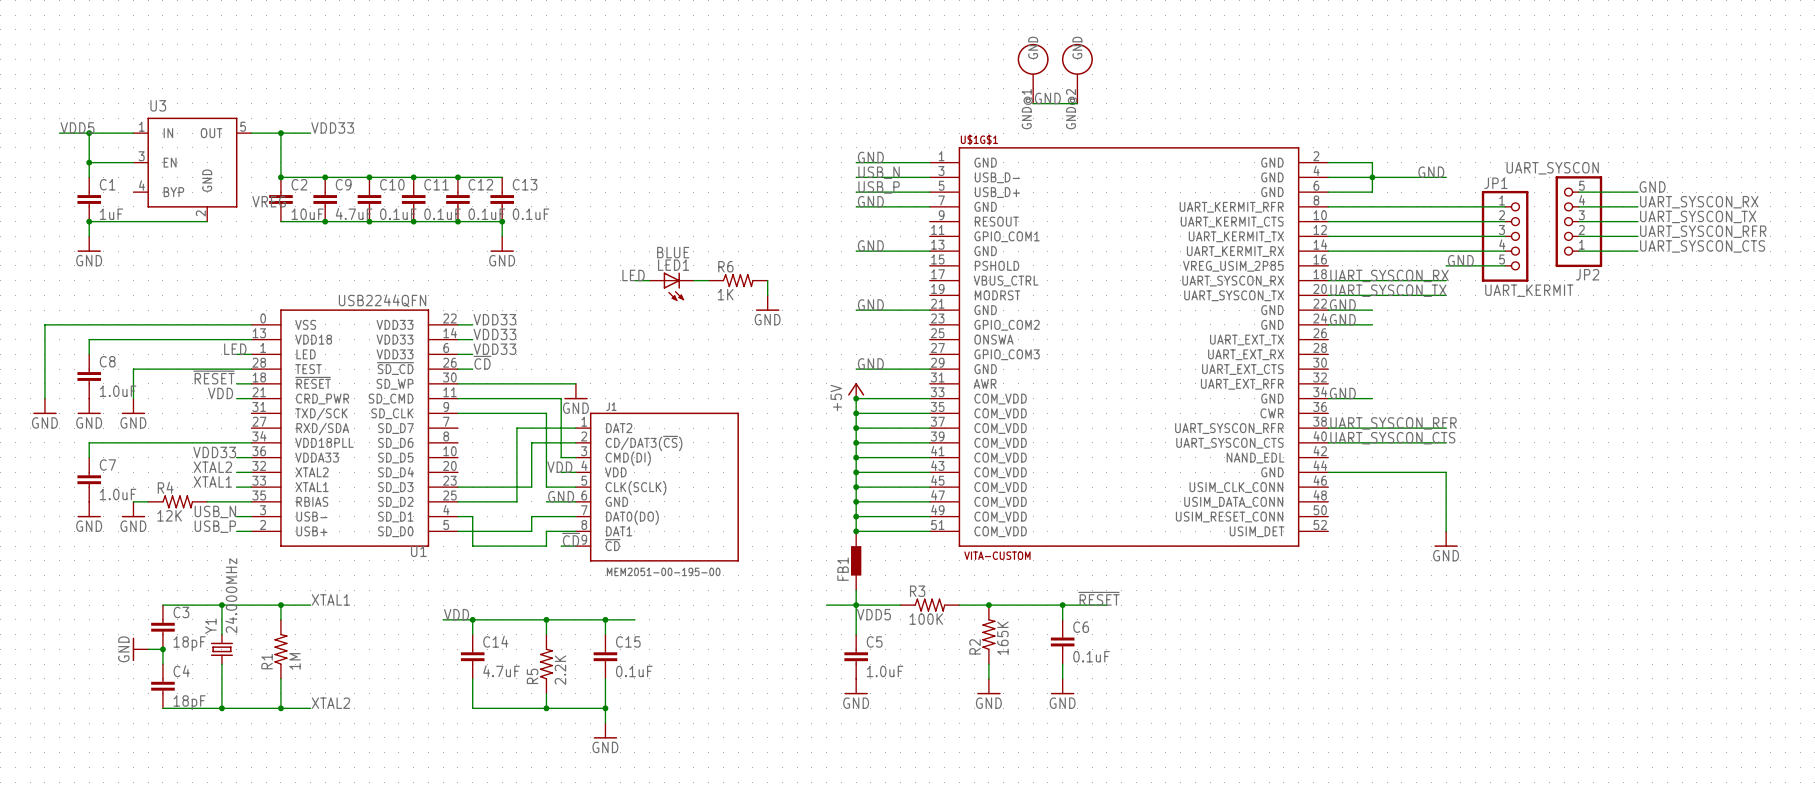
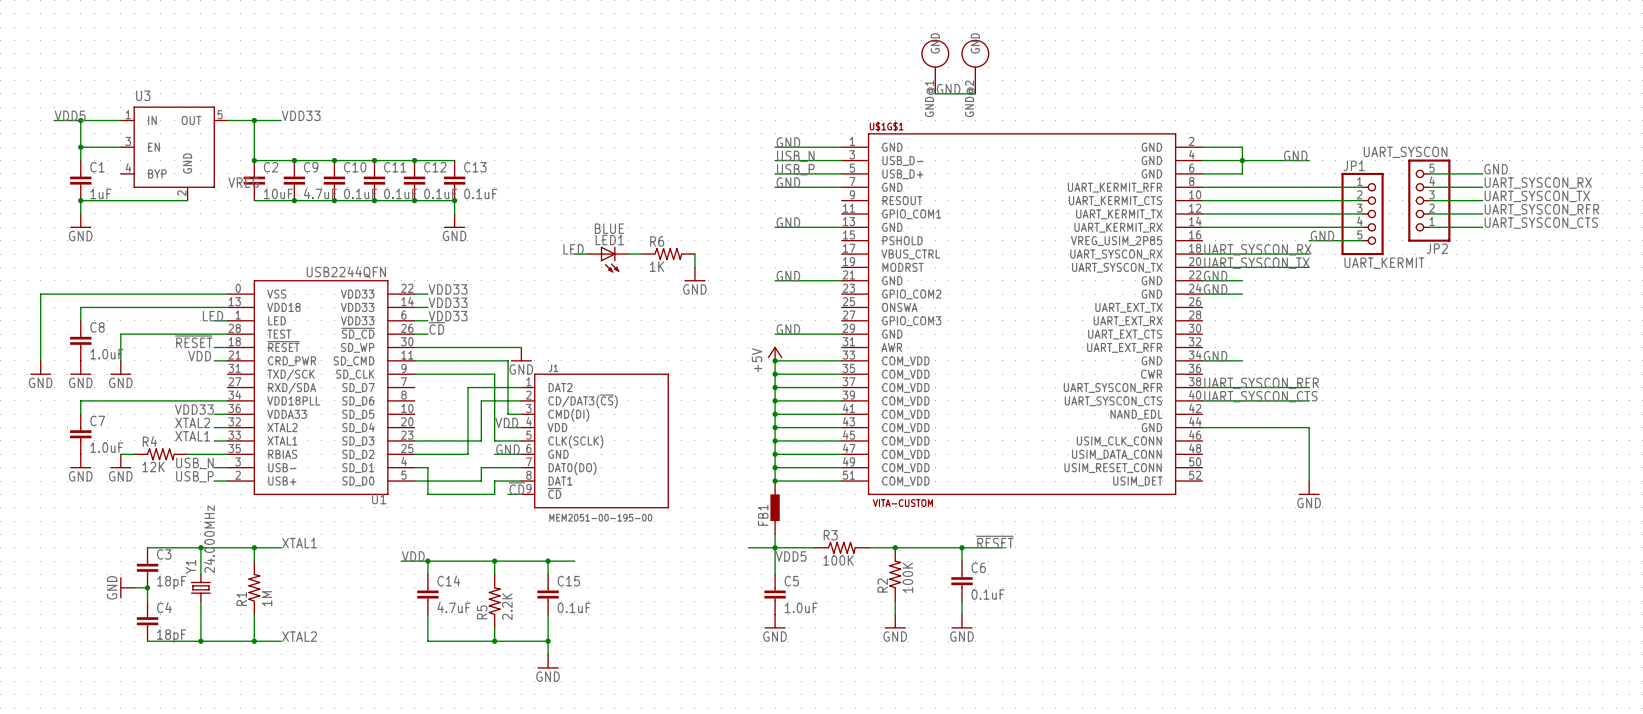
R2 value: 165K (1002, 638) -> 100K (907, 577)

